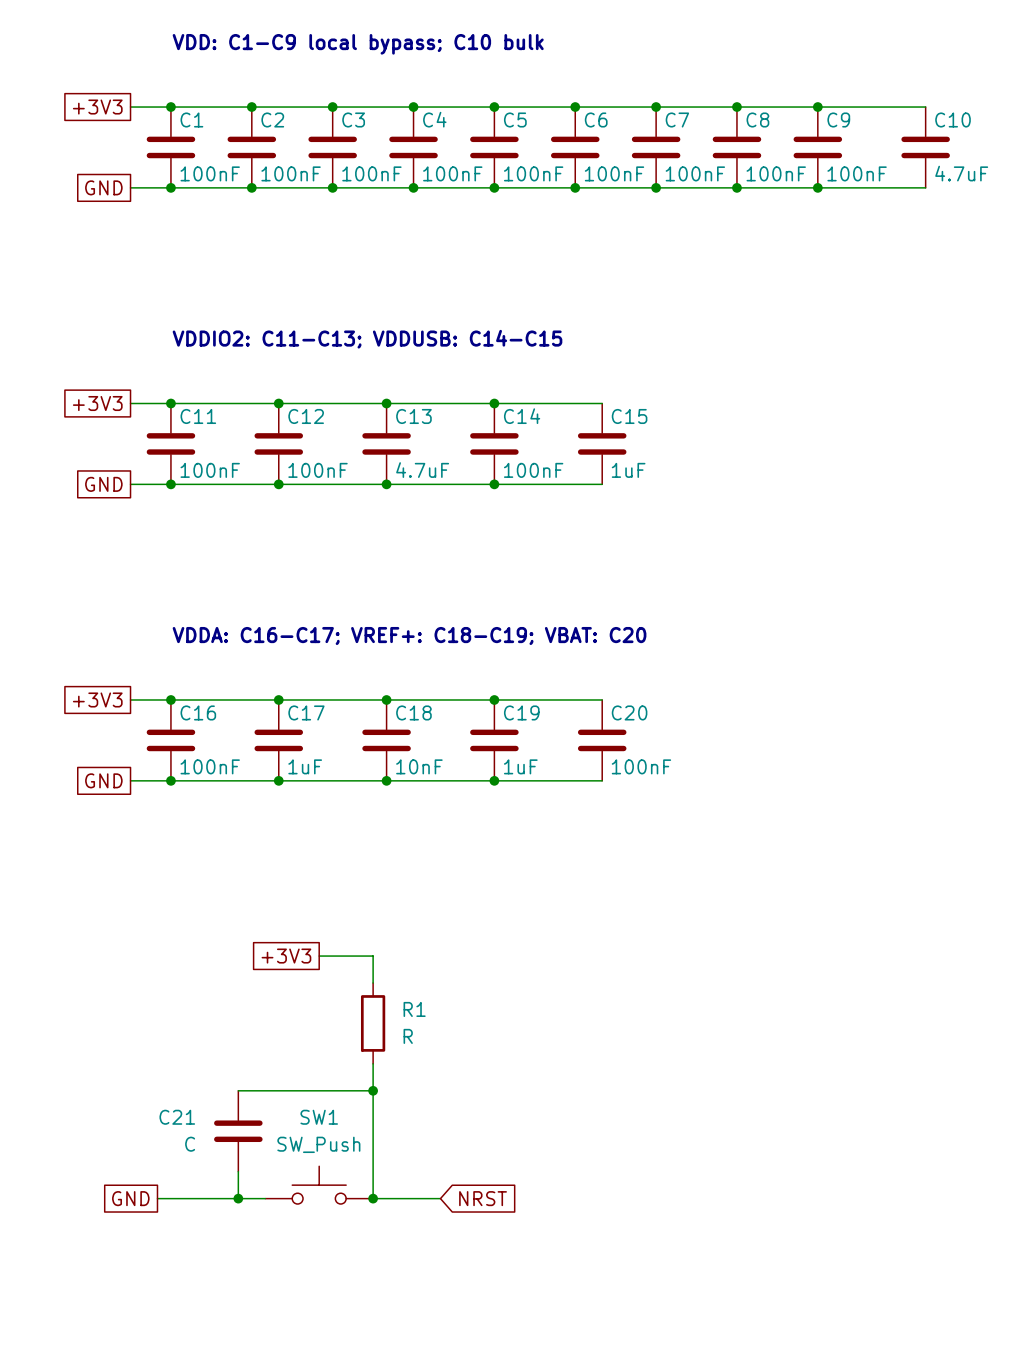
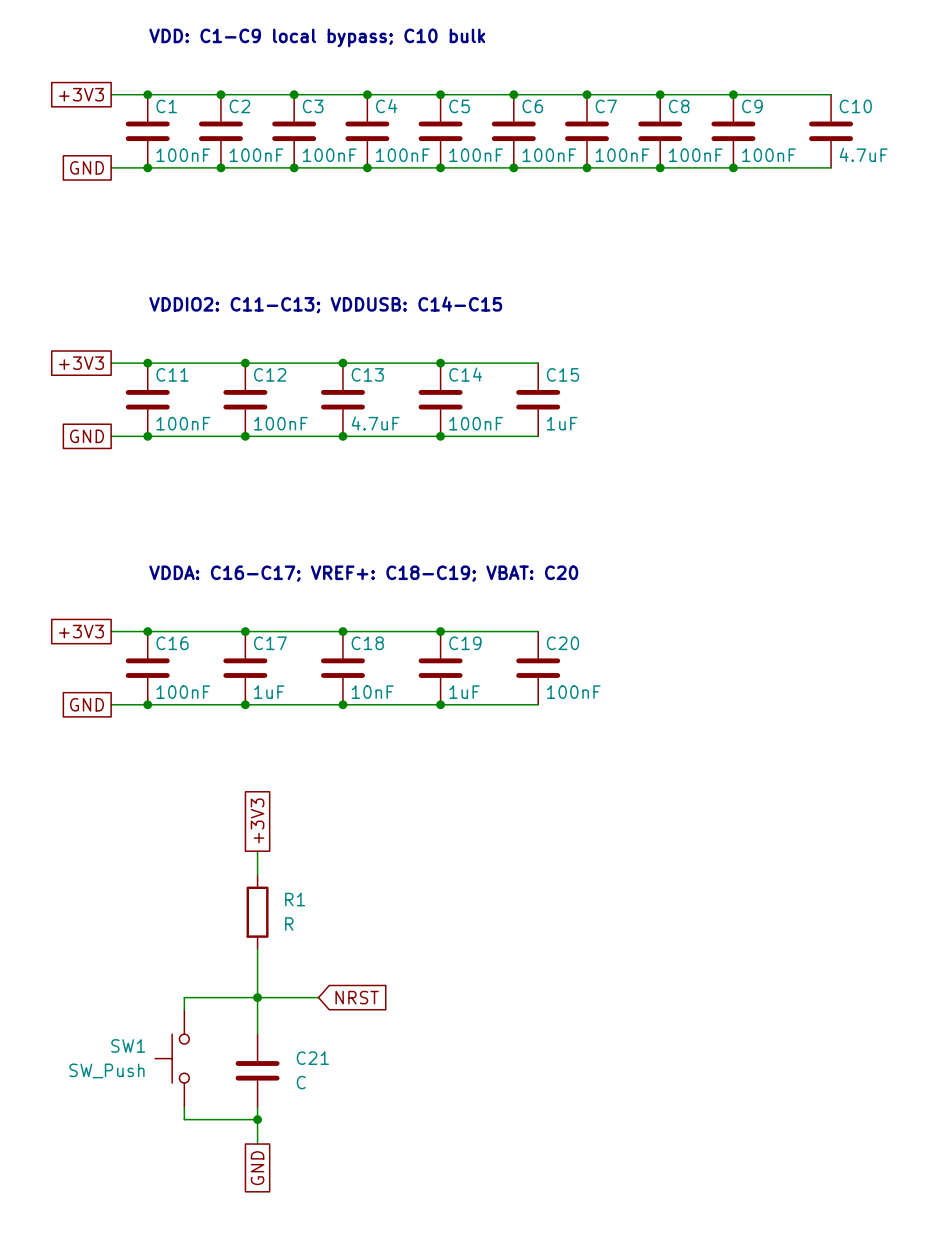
global label rotation: 0° (286, 956) -> 90° clockwise (257, 820)
wire: (319, 956) (373, 956) (373, 983) -> none
R1 position: (373, 1023) -> (257, 912)
wire: none -> (257, 948) (257, 1034)
wire: (373, 1063) (373, 1198) (440, 1198) -> none
wire: (238, 1090) (373, 1090) -> none
junction: (373, 1090) -> none
junction: none -> (257, 997)
wire: none -> (318, 997) (184, 997) (184, 1009)
C21 name position: C21 (177, 1117) -> C21 (312, 1058)
C21 position: (238, 1131) -> (257, 1070)
C21 value position: C (190, 1144) -> C (301, 1082)
SW1 value position: SW_Push (318, 1144) -> SW_Push (106, 1070)
wire: (238, 1171) (238, 1198) -> (257, 851) (257, 875)
SW1 rotation: 0° (319, 1185) -> 90° counterclockwise (172, 1058)
SW1 position: (319, 1185) -> (172, 1058)
global label rotation: 0° (130, 1198) -> 90° counterclockwise (257, 1168)
global label position: GND (130, 1198) -> GND (257, 1168)
wire: (157, 1198) (265, 1198) -> none
junction: (238, 1198) -> none
junction: (373, 1198) -> none
global label position: NRST (483, 1198) -> NRST (357, 997)
wire: none -> (184, 1107) (184, 1119) (257, 1119)
wire: none -> (257, 1107) (257, 1144)
junction: none -> (257, 1119)

